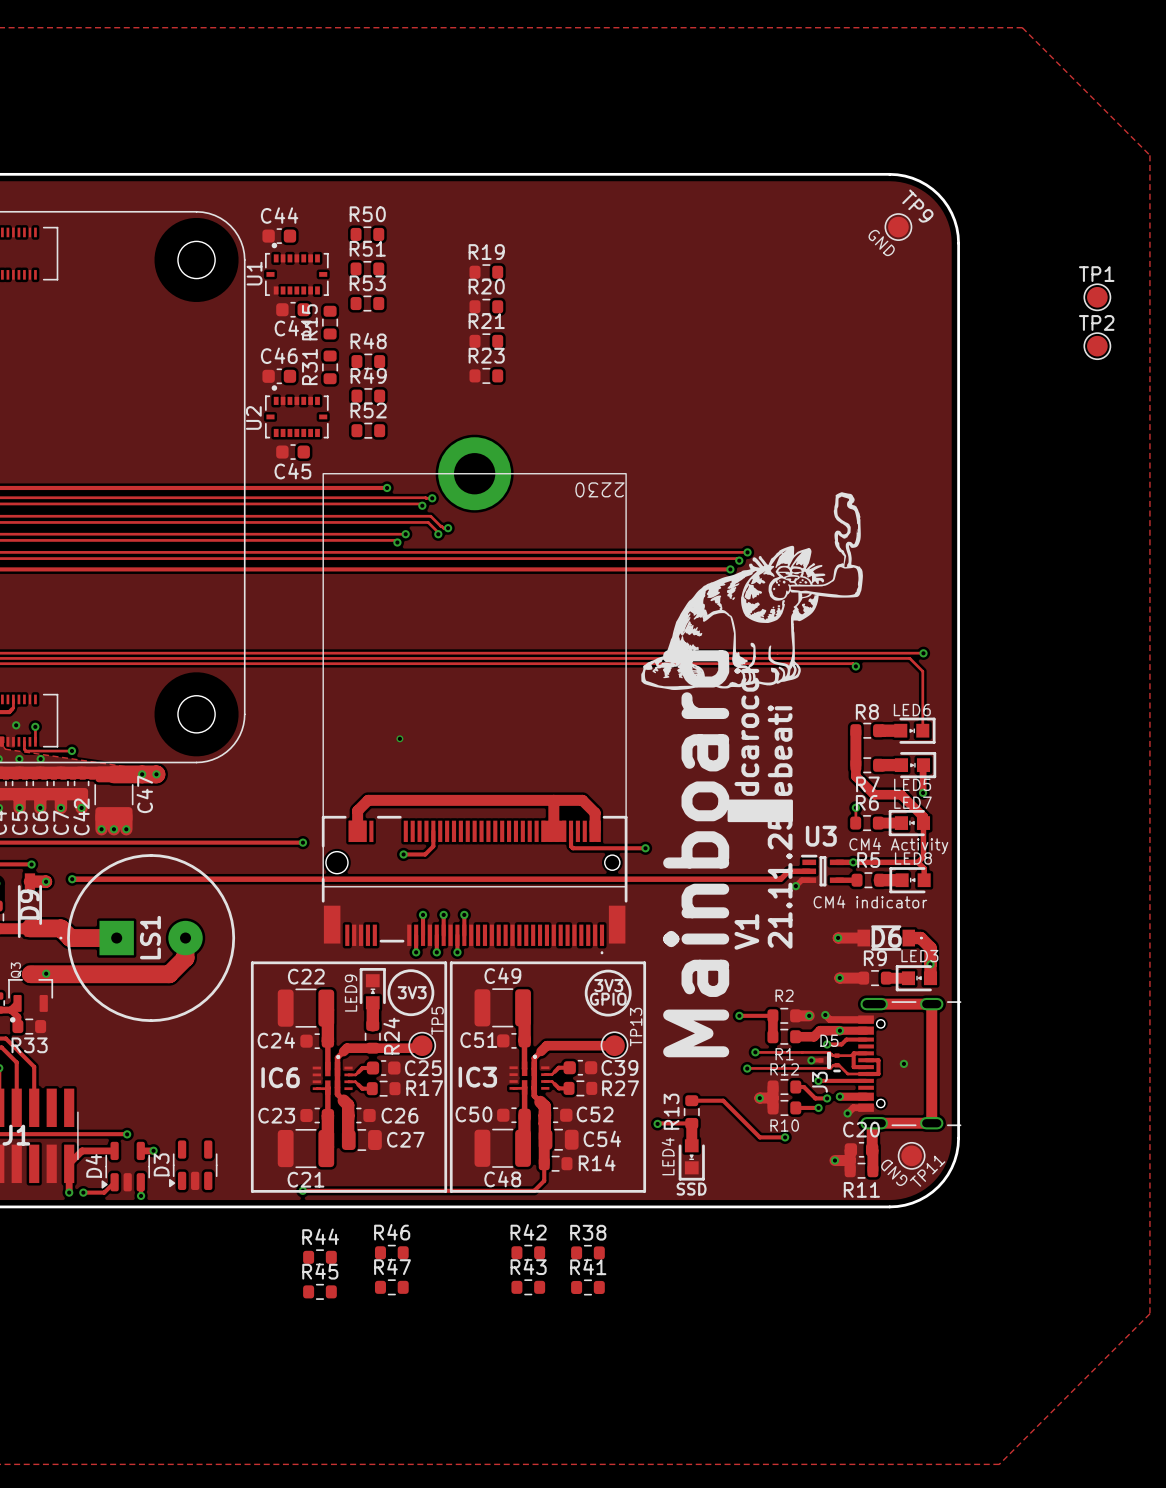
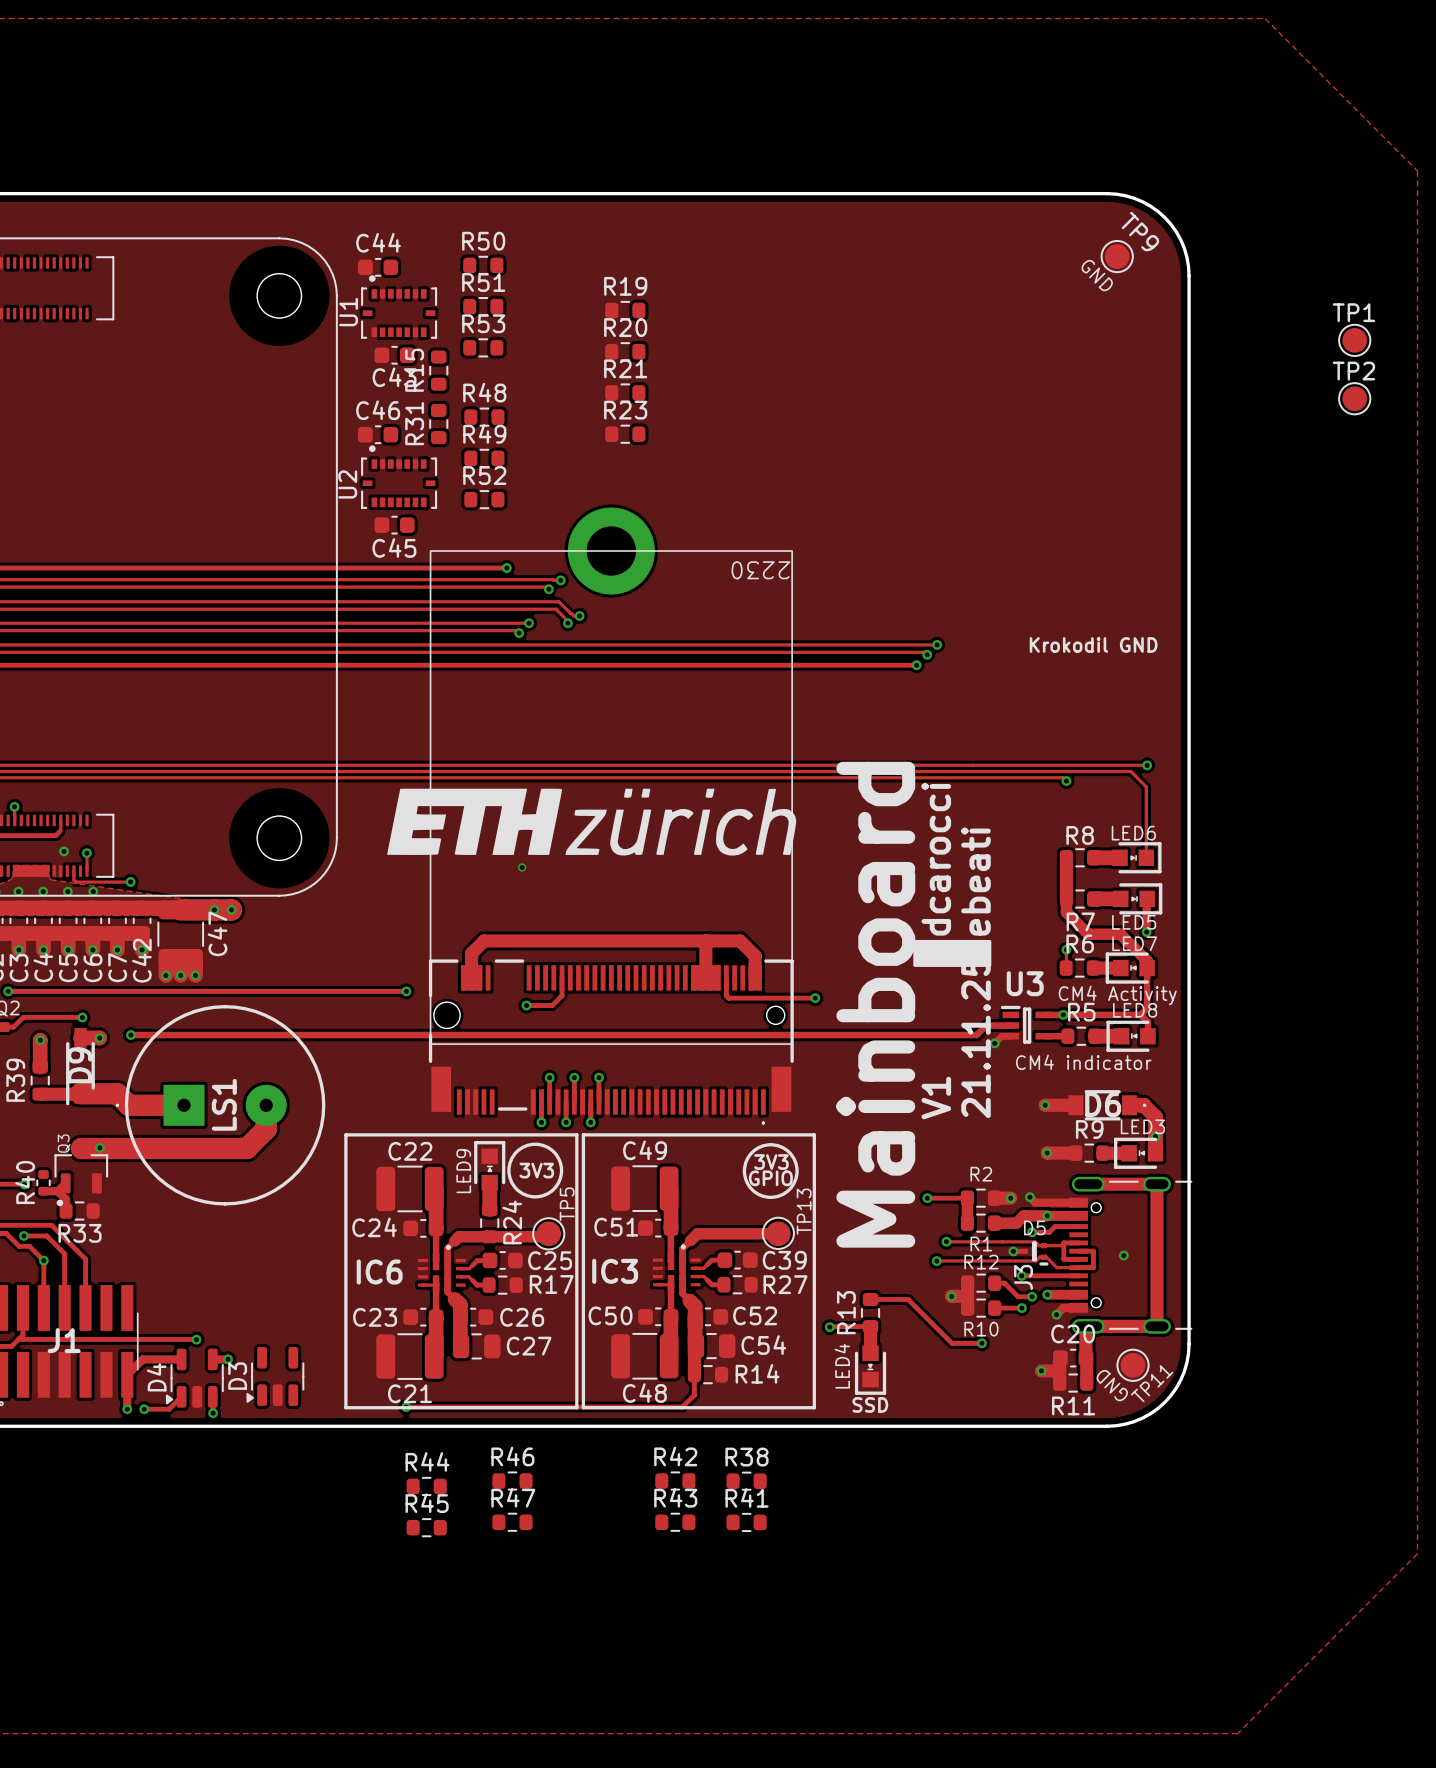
drawing: [641, 492, 863, 691] -> none
text: none -> Krokodil GND (1093, 644)
drawing: none -> [387, 788, 797, 856]

